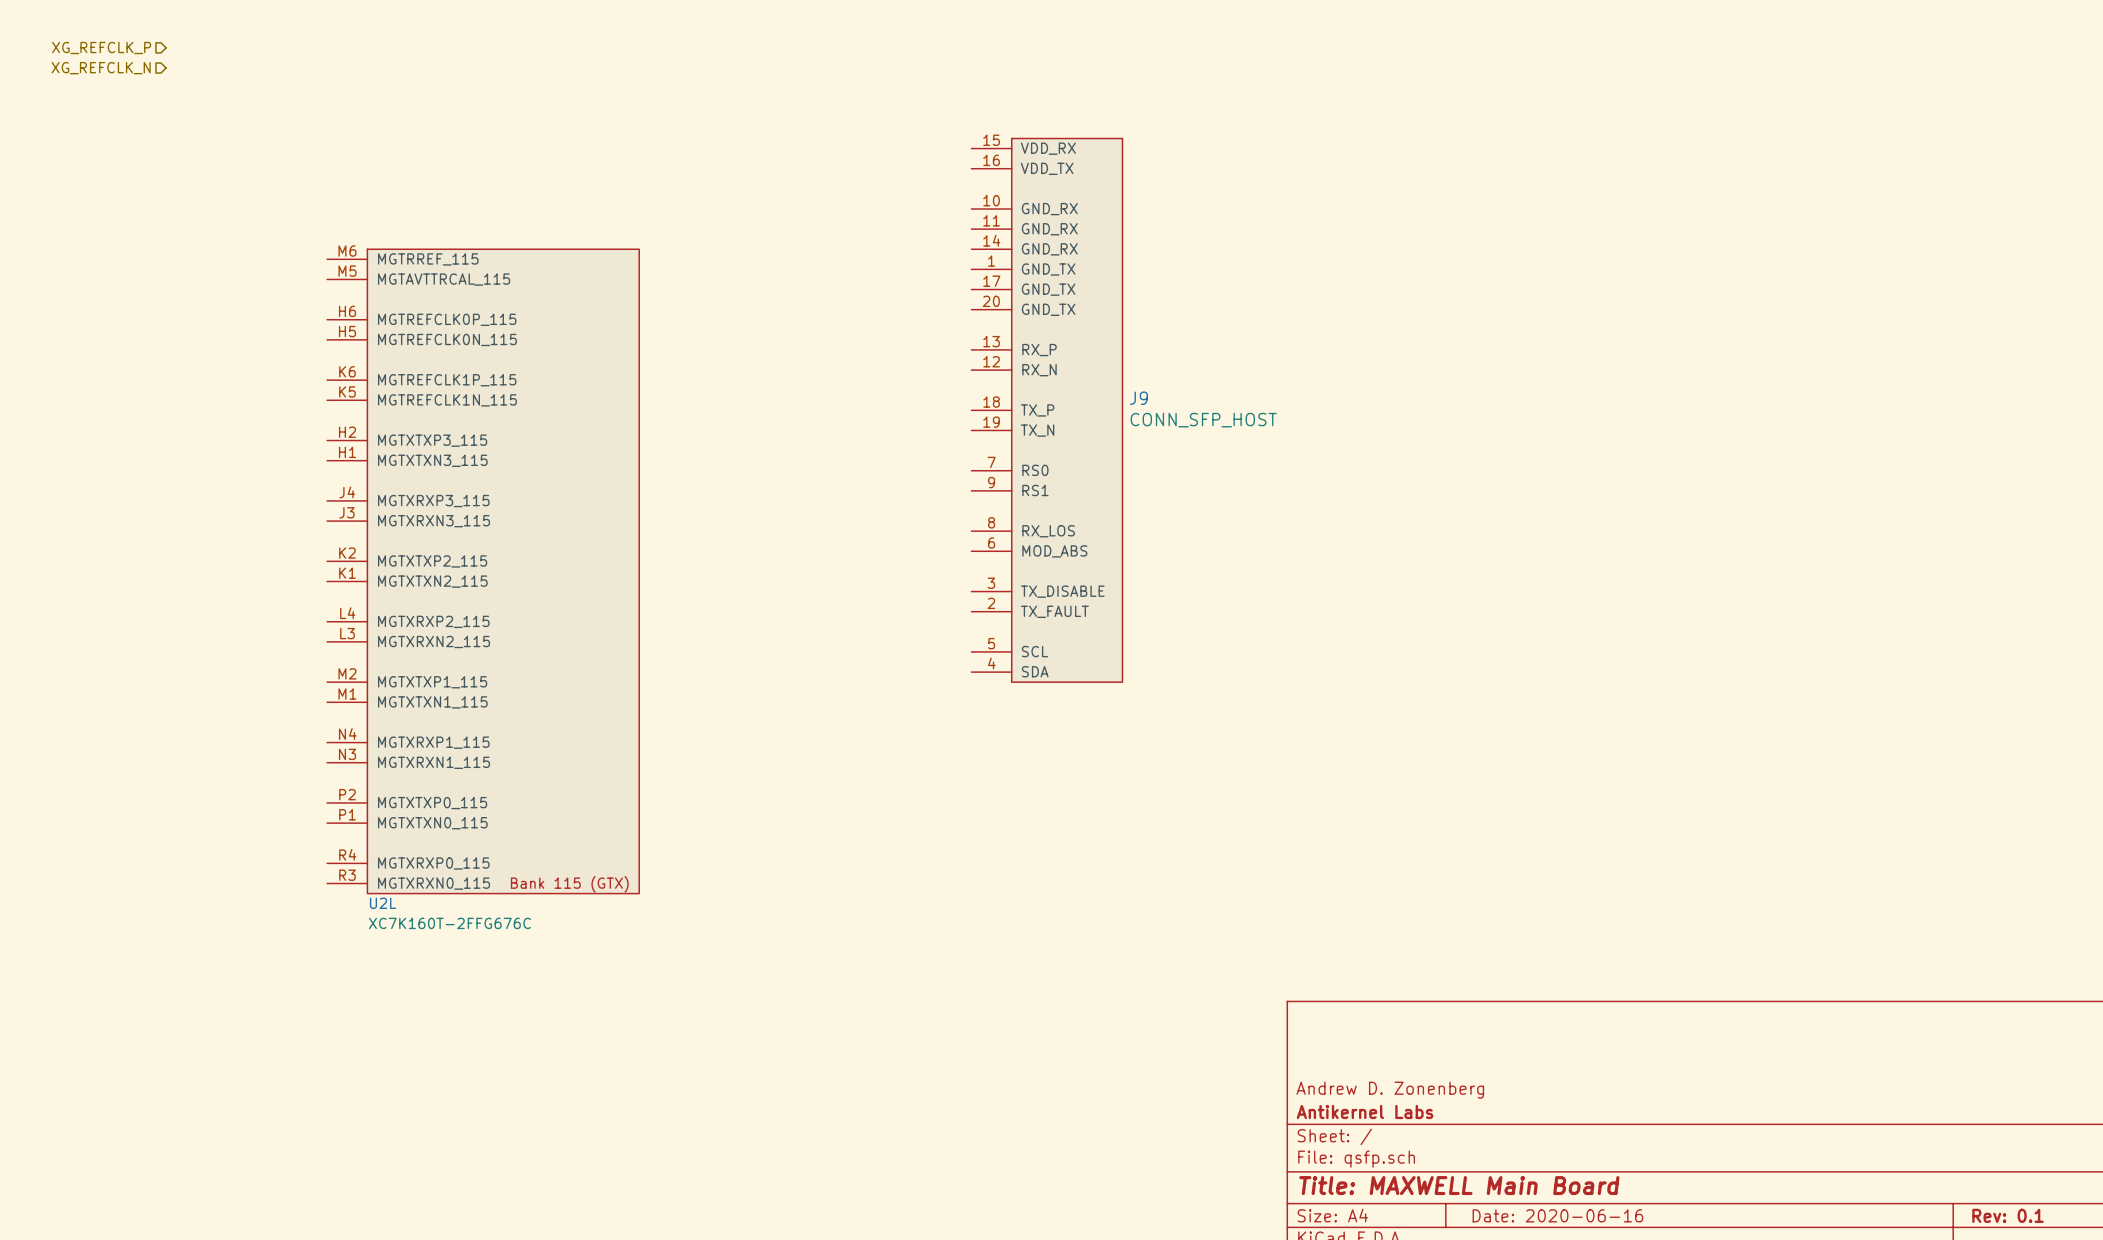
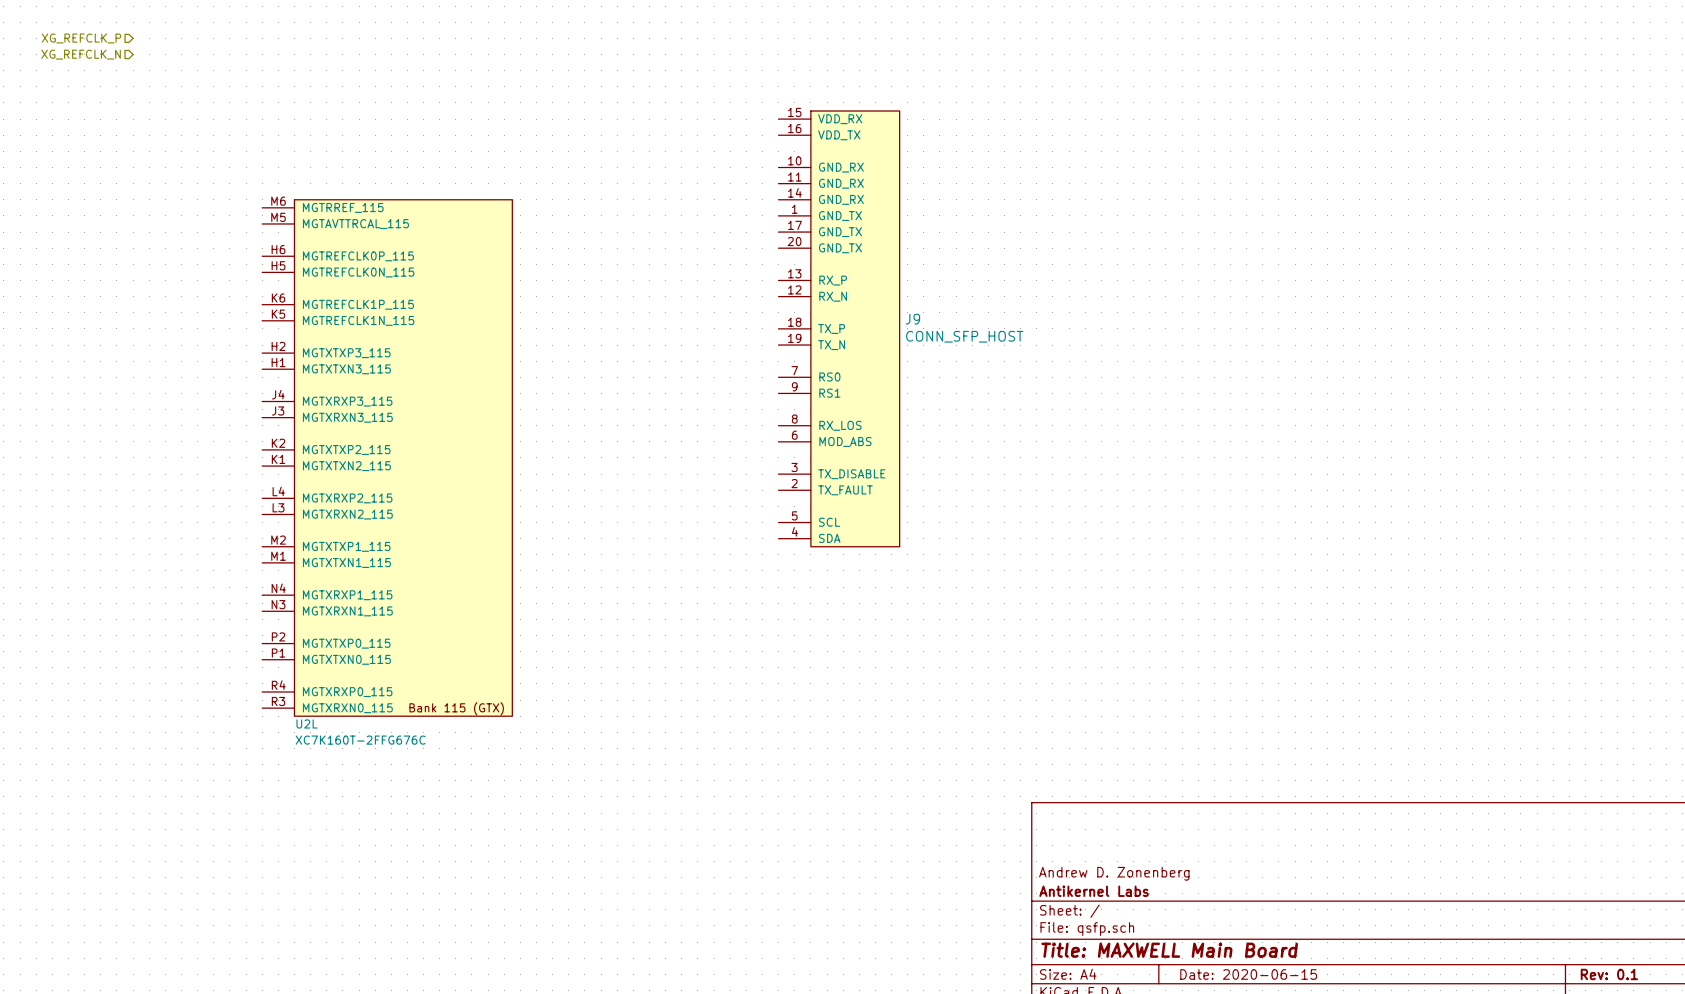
title block: Date: 2020-06-16 (1557, 1215) -> Date: 2020-06-15 (1248, 974)

